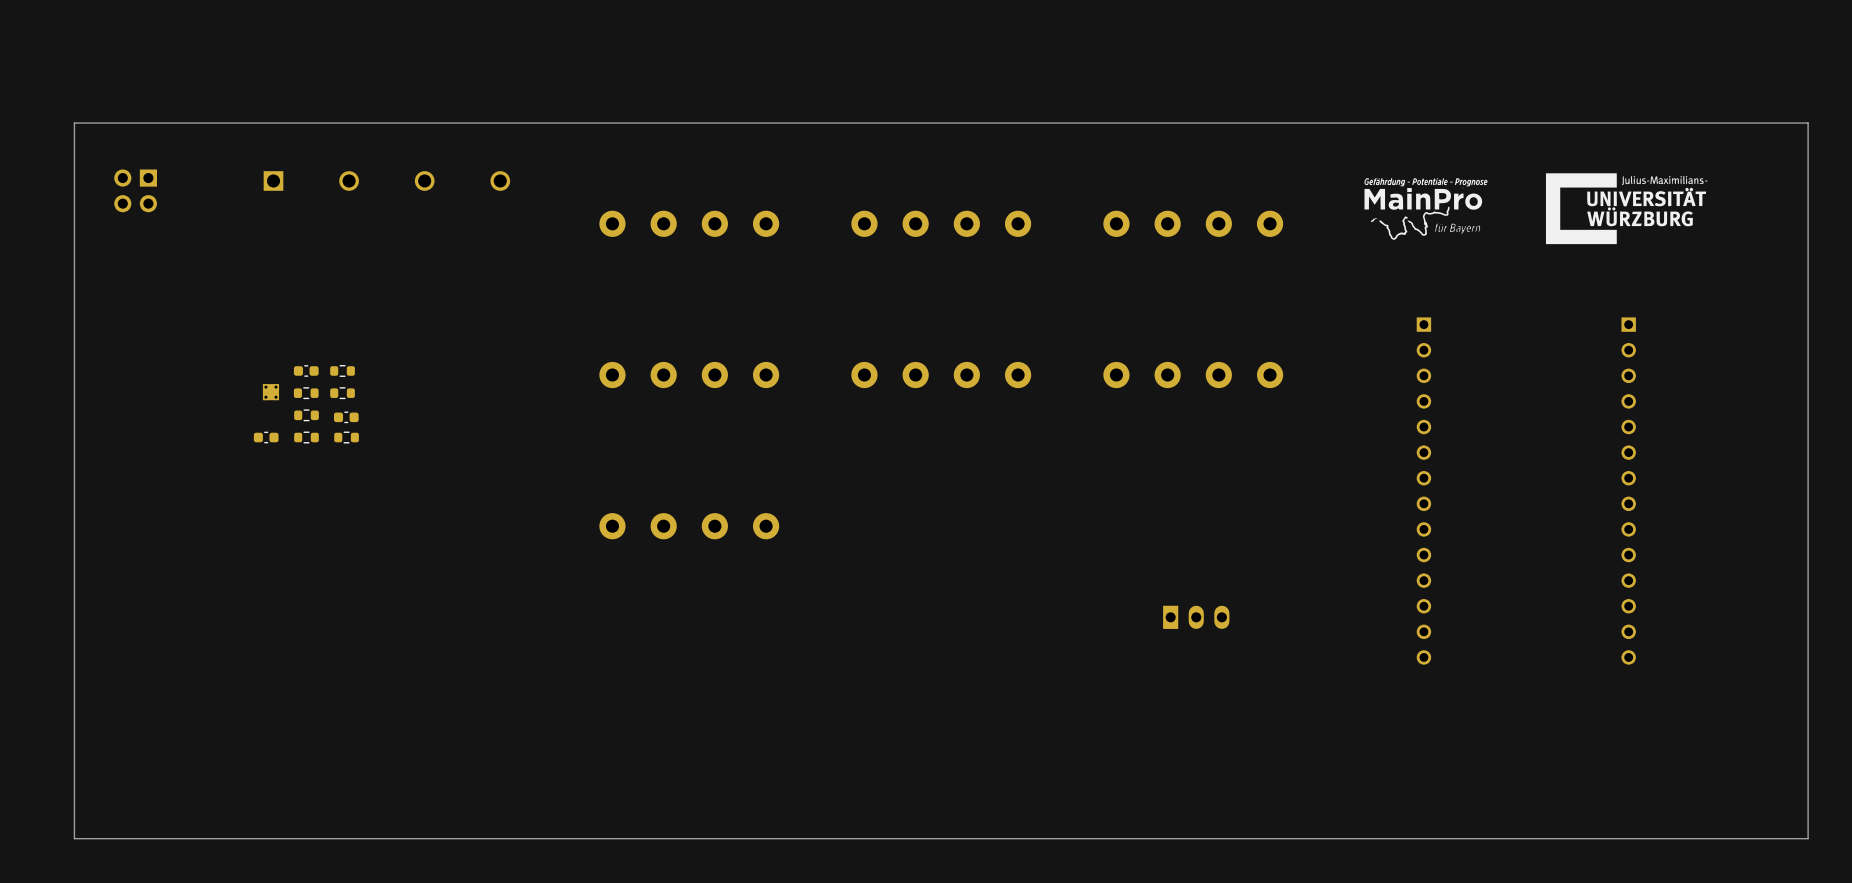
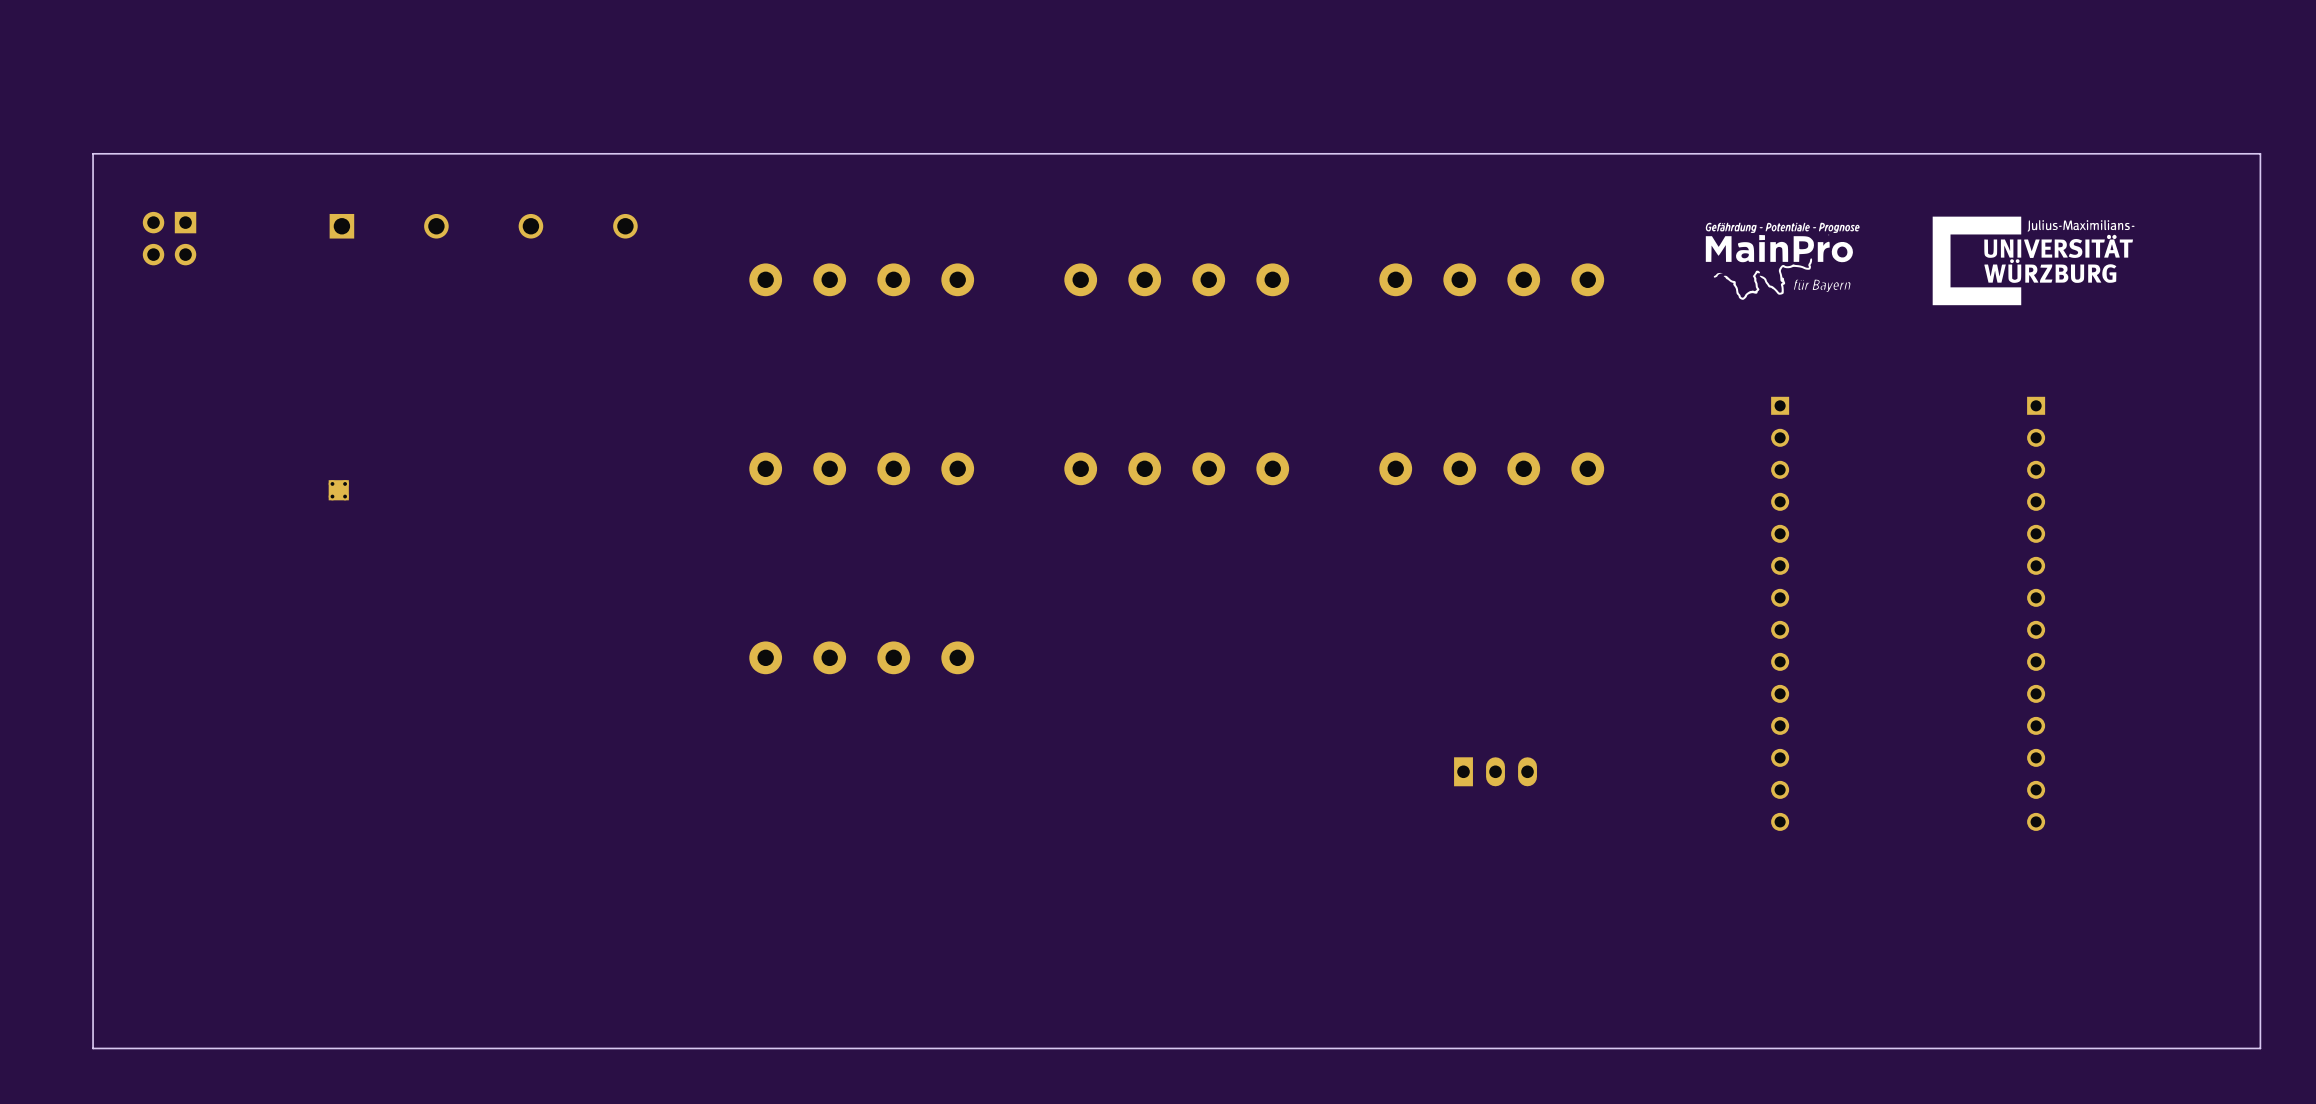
part: (306, 370) -> none
part: (342, 370) -> none
part: (306, 393) -> none
part: (342, 393) -> none
part: (306, 415) -> none
part: (346, 417) -> none
part: (266, 437) -> none
part: (306, 437) -> none
part: (346, 437) -> none

